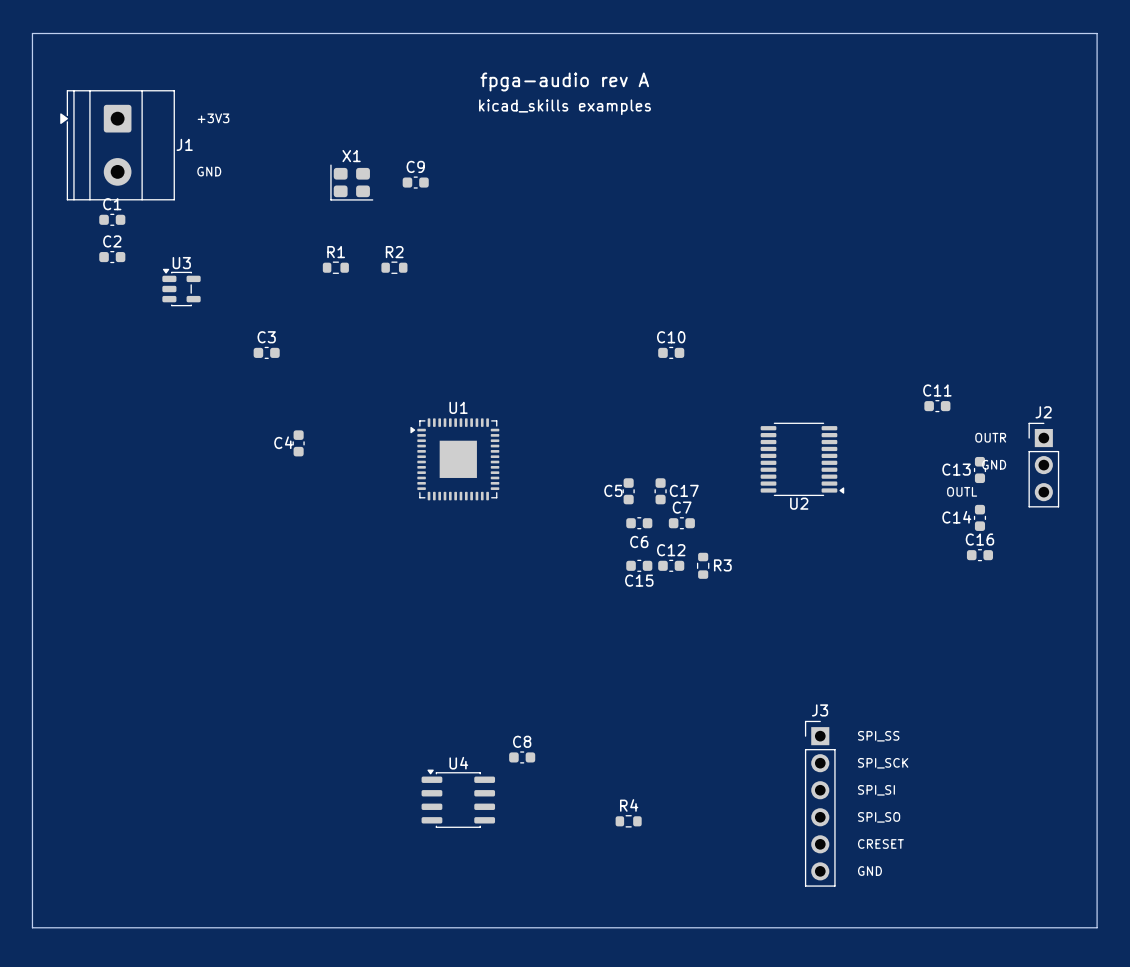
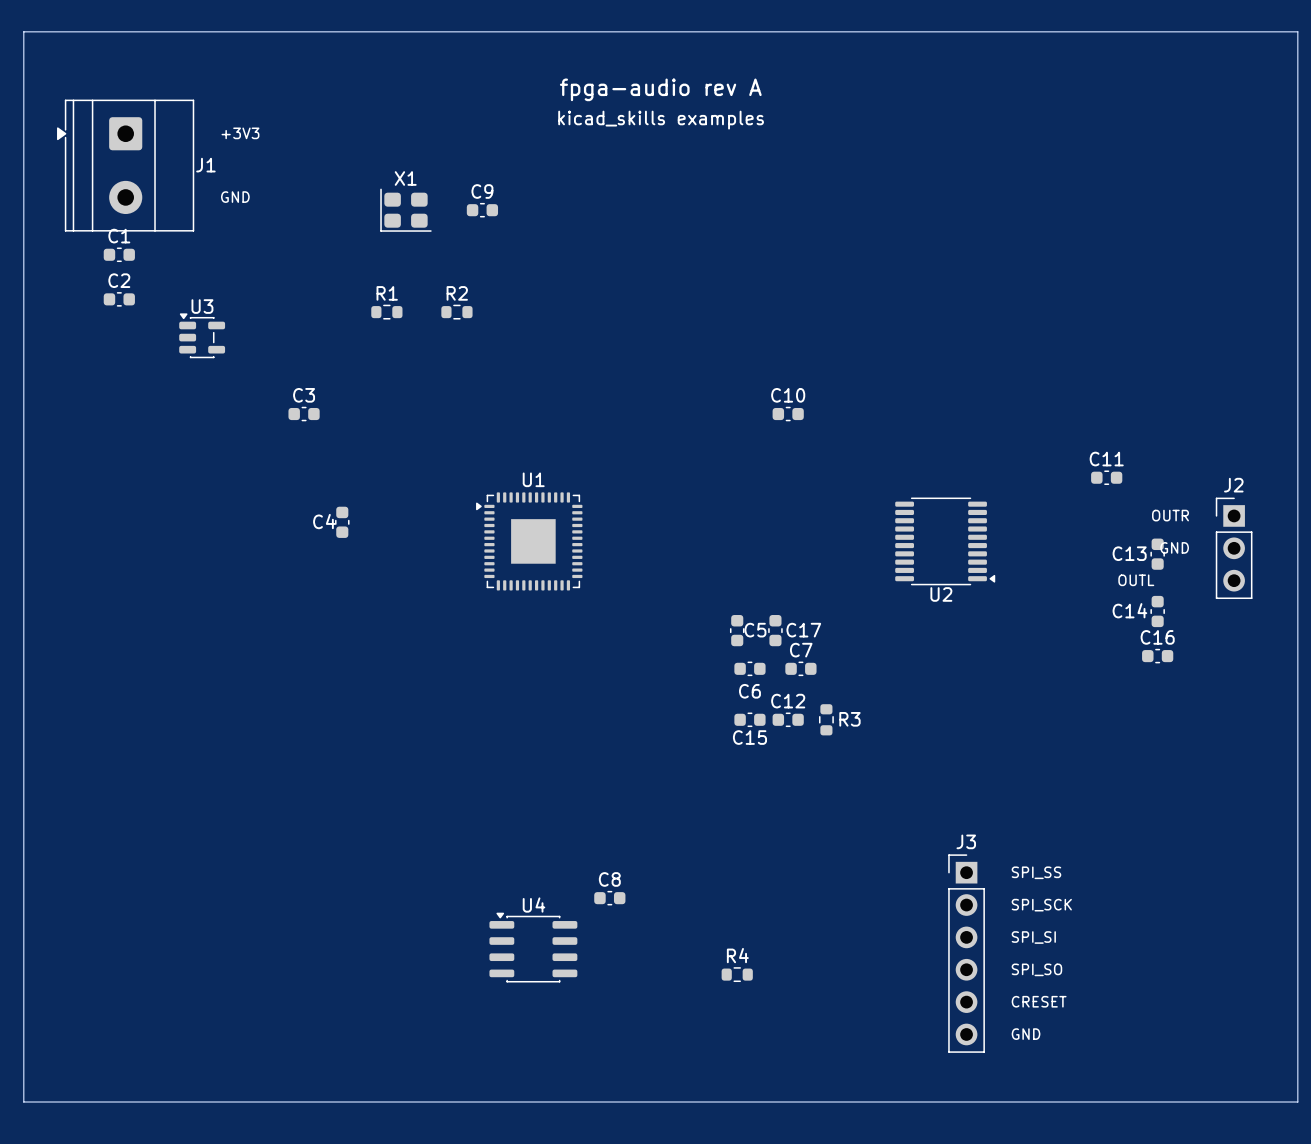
C5 name position: C5 (613, 490) -> C5 (755, 630)
C5 position: (628, 491) -> (737, 630)
C17 position: (660, 491) -> (775, 630)
C6: (639, 523) -> none
C7 position: (681, 523) -> (800, 668)
C12 position: (671, 565) -> (788, 719)
R3 position: (703, 565) -> (826, 719)
C15 name: C15 (639, 580) -> C6 (749, 691)
C15: none -> (749, 719)

